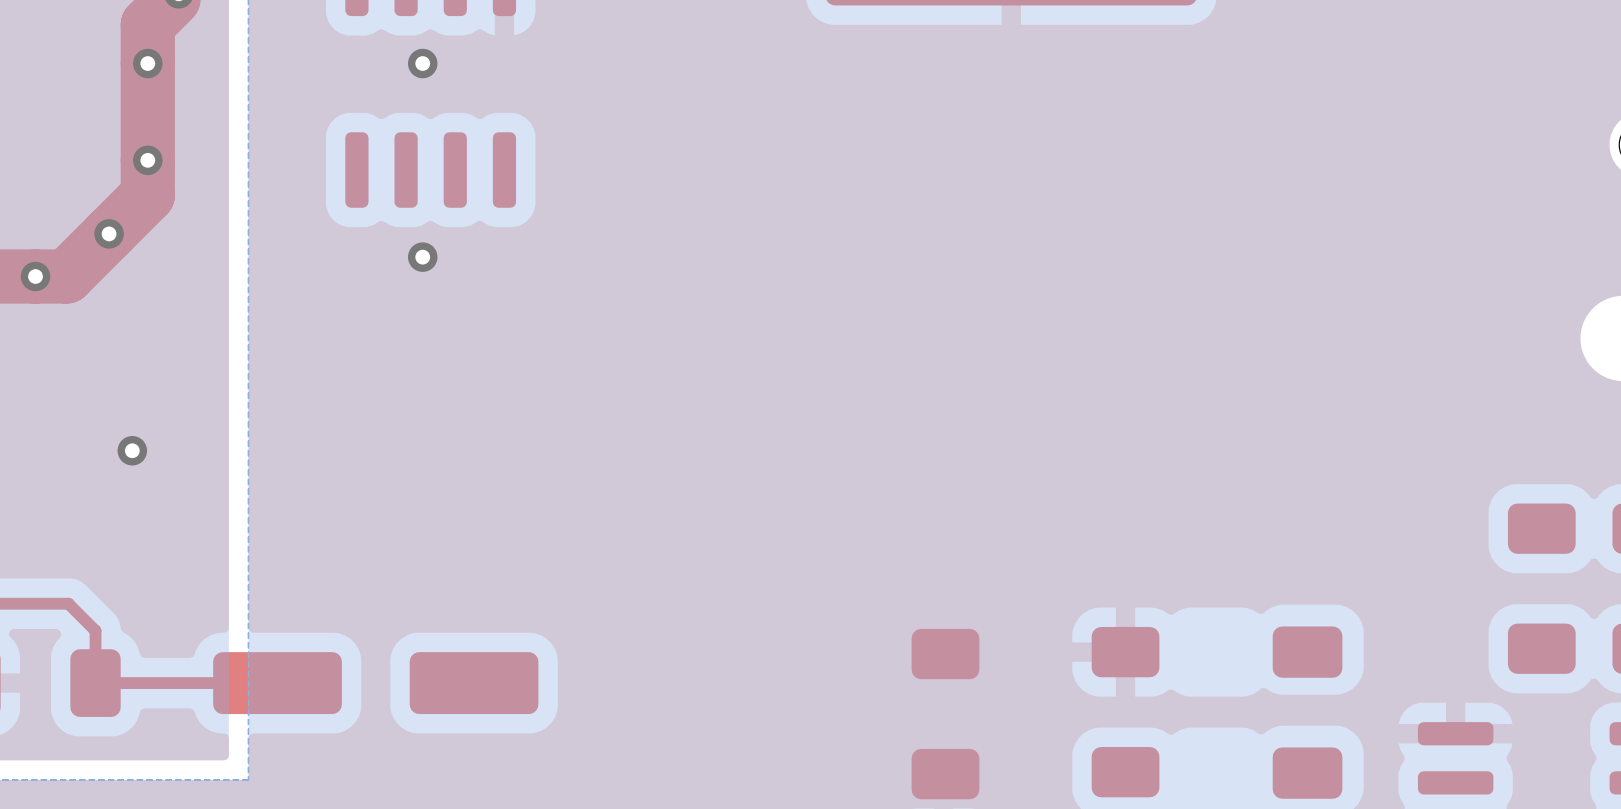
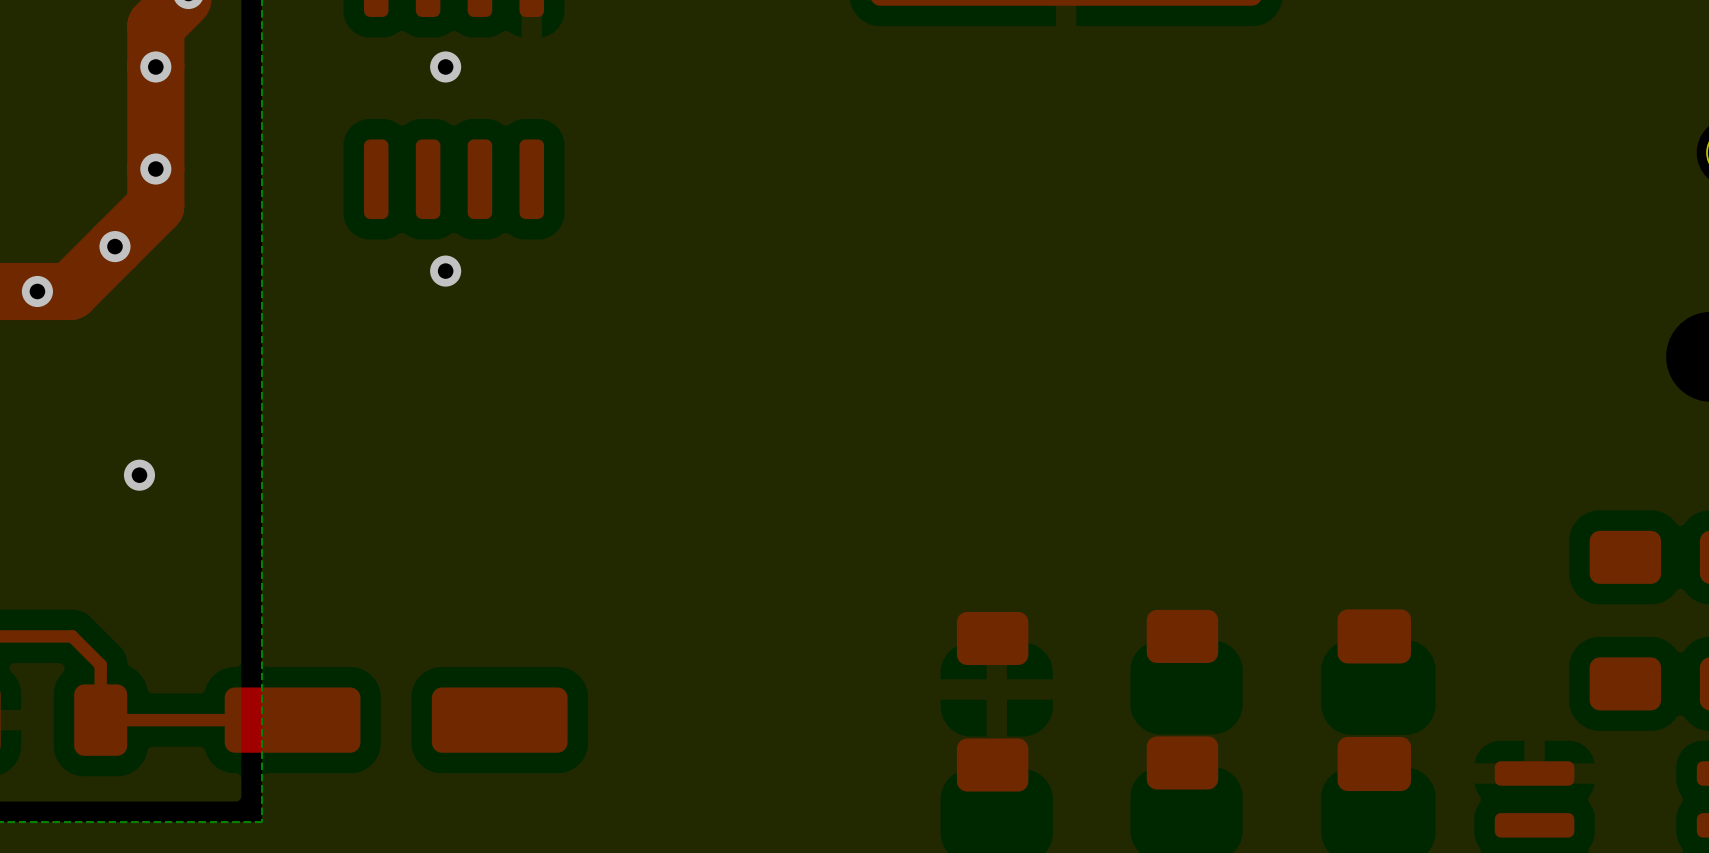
part position: (1125, 712) -> (1182, 699)
part position: (1307, 712) -> (1374, 700)
part position: (945, 714) -> (992, 701)

